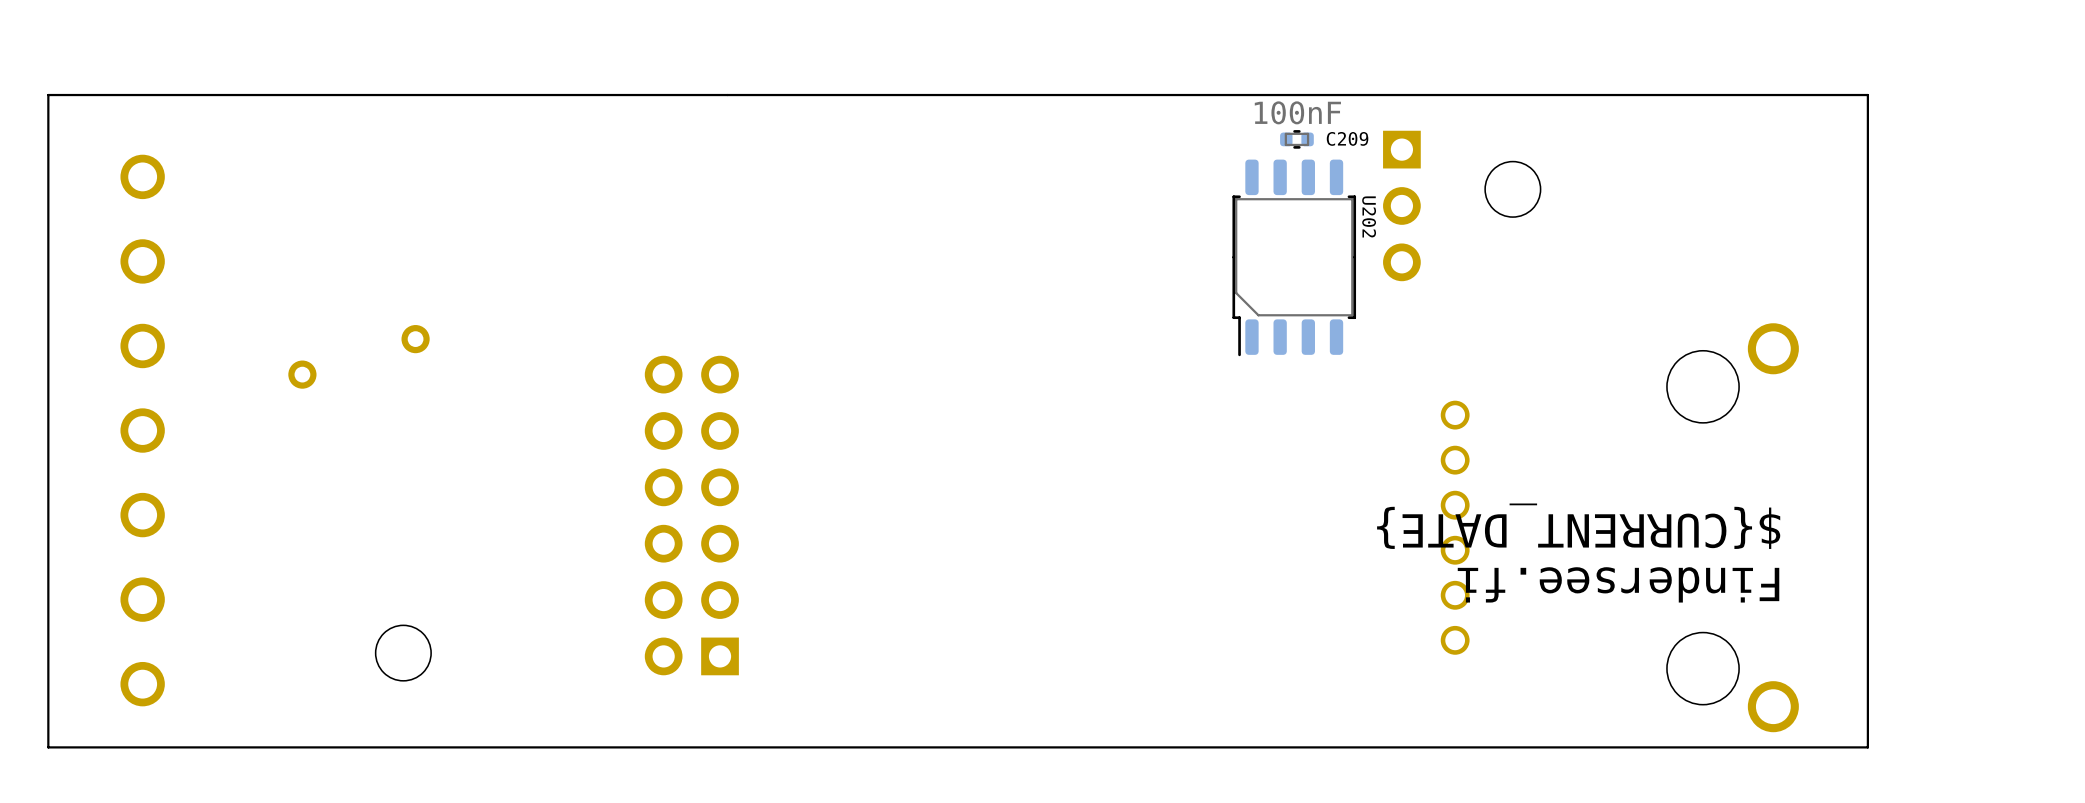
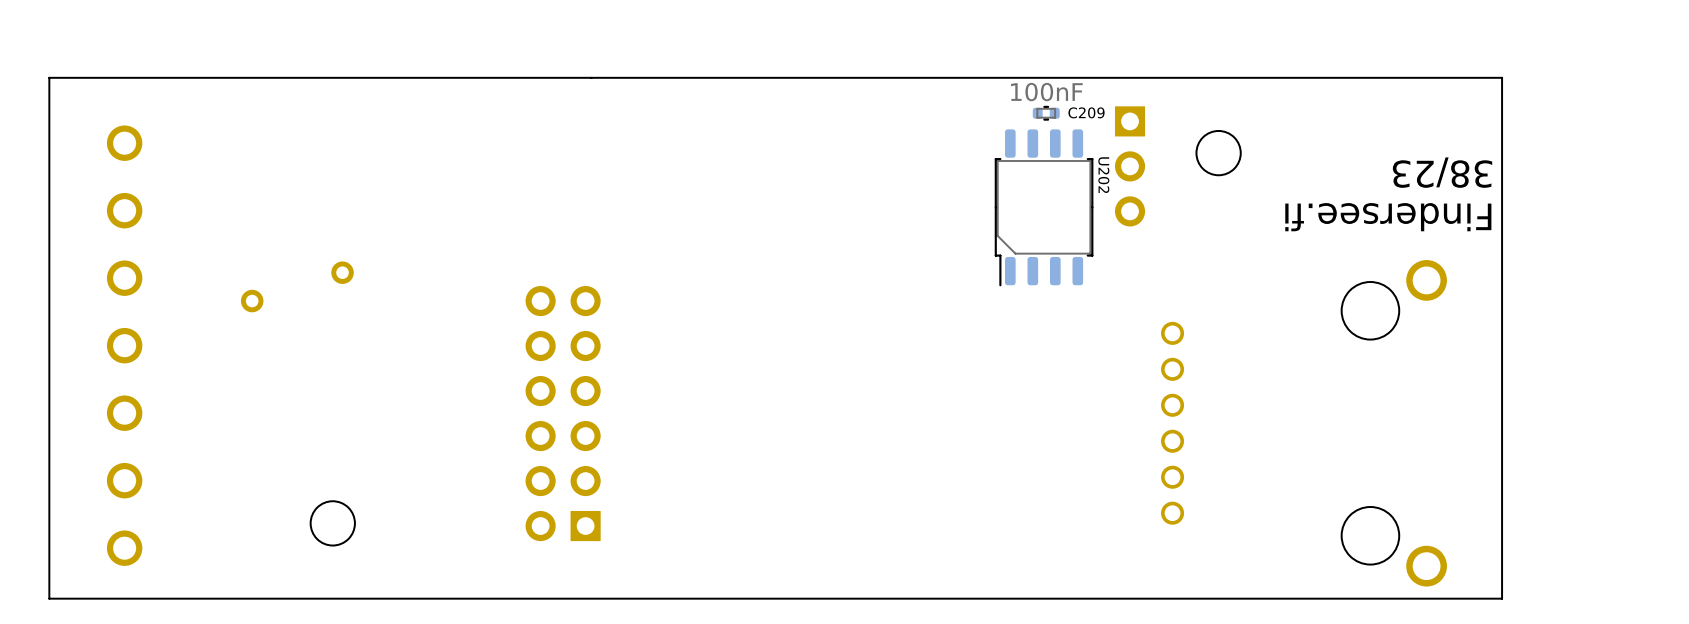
text: none -> 38/23 (1442, 172)
text: ${CURRENT_DATE} (1578, 526) -> none
text position: Findersee.fi (1618, 584) -> Findersee.fi (1388, 217)

